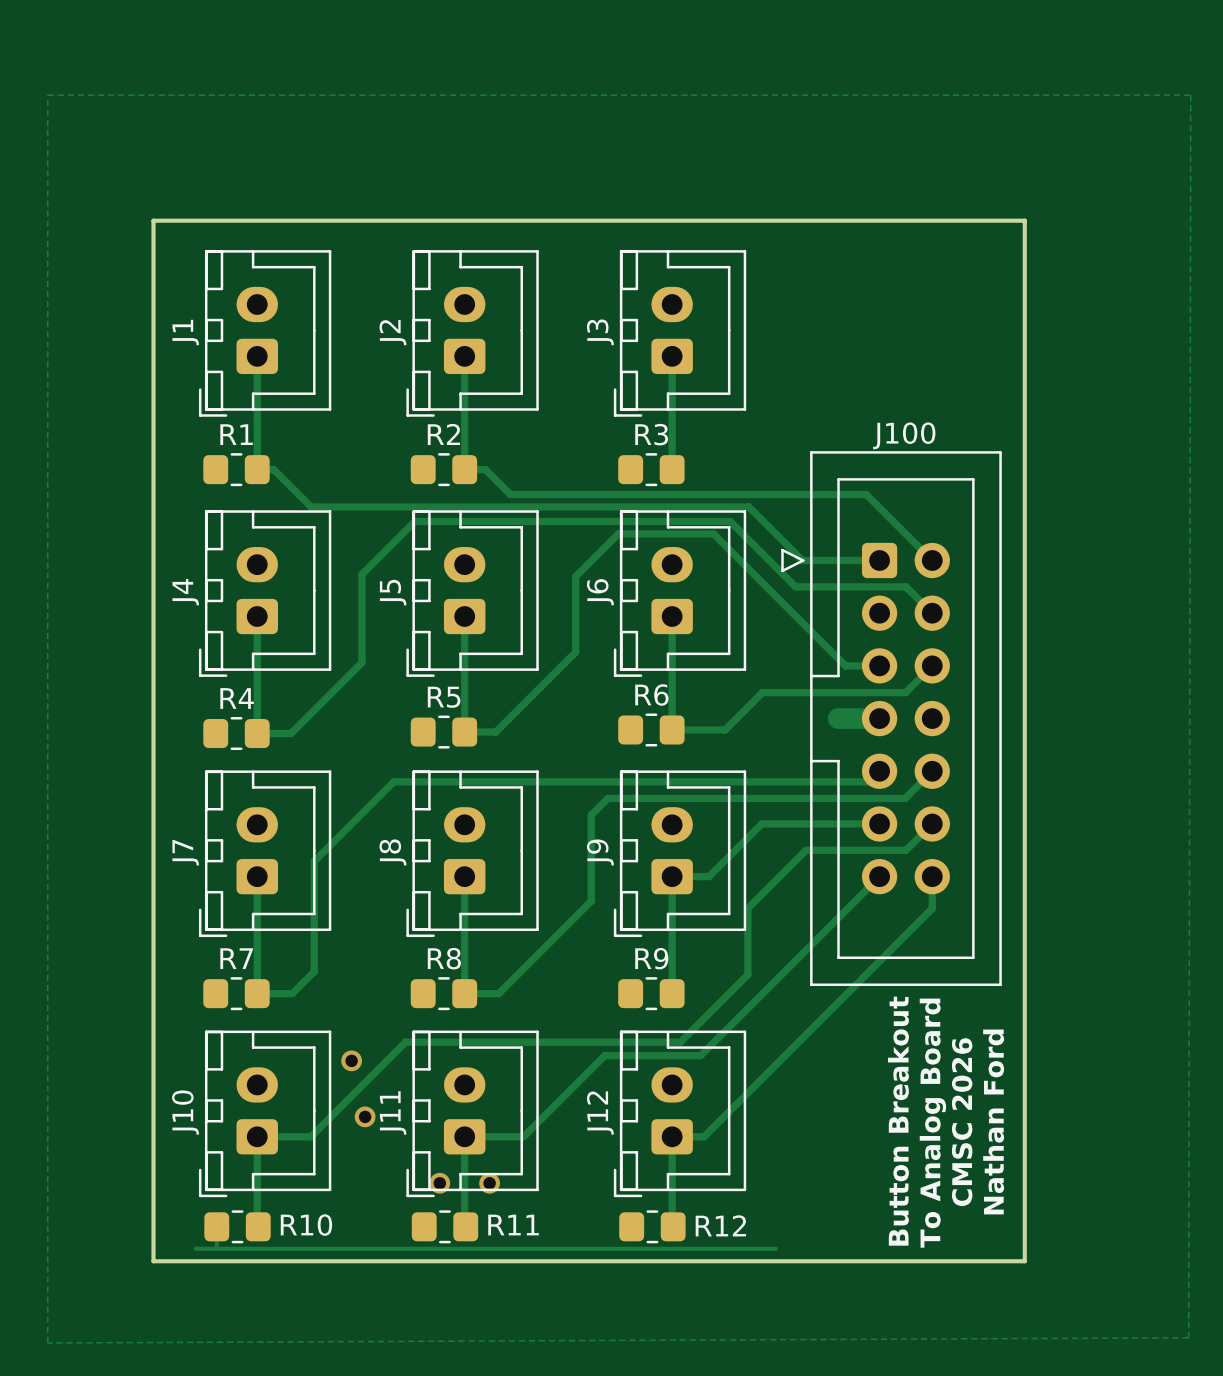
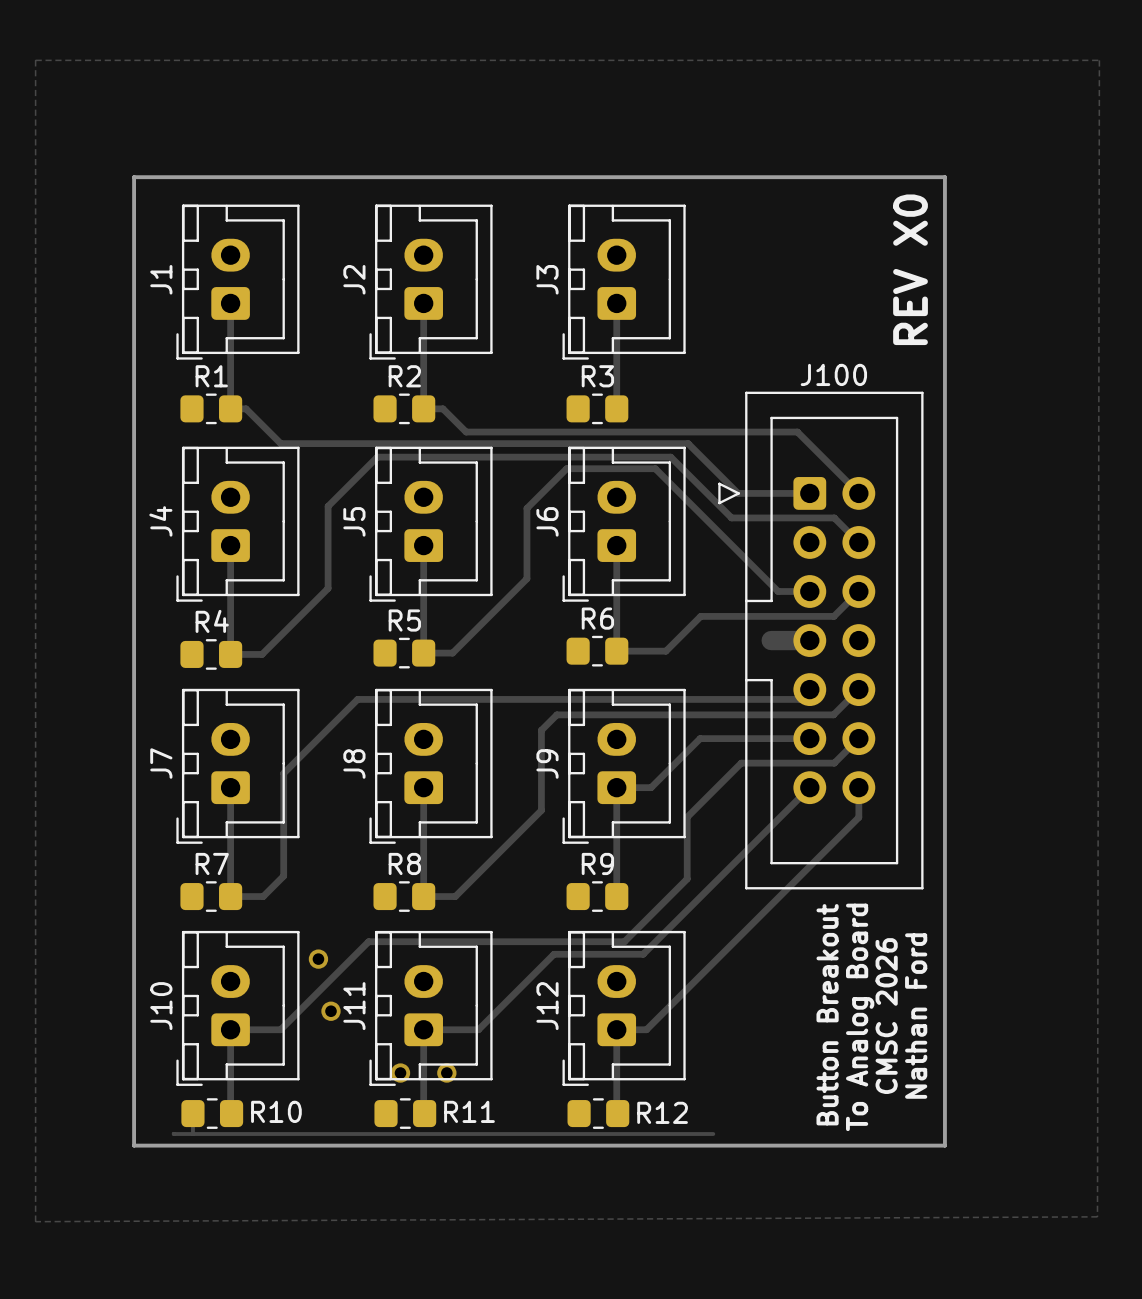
text: none -> REV X0 (910, 269)

